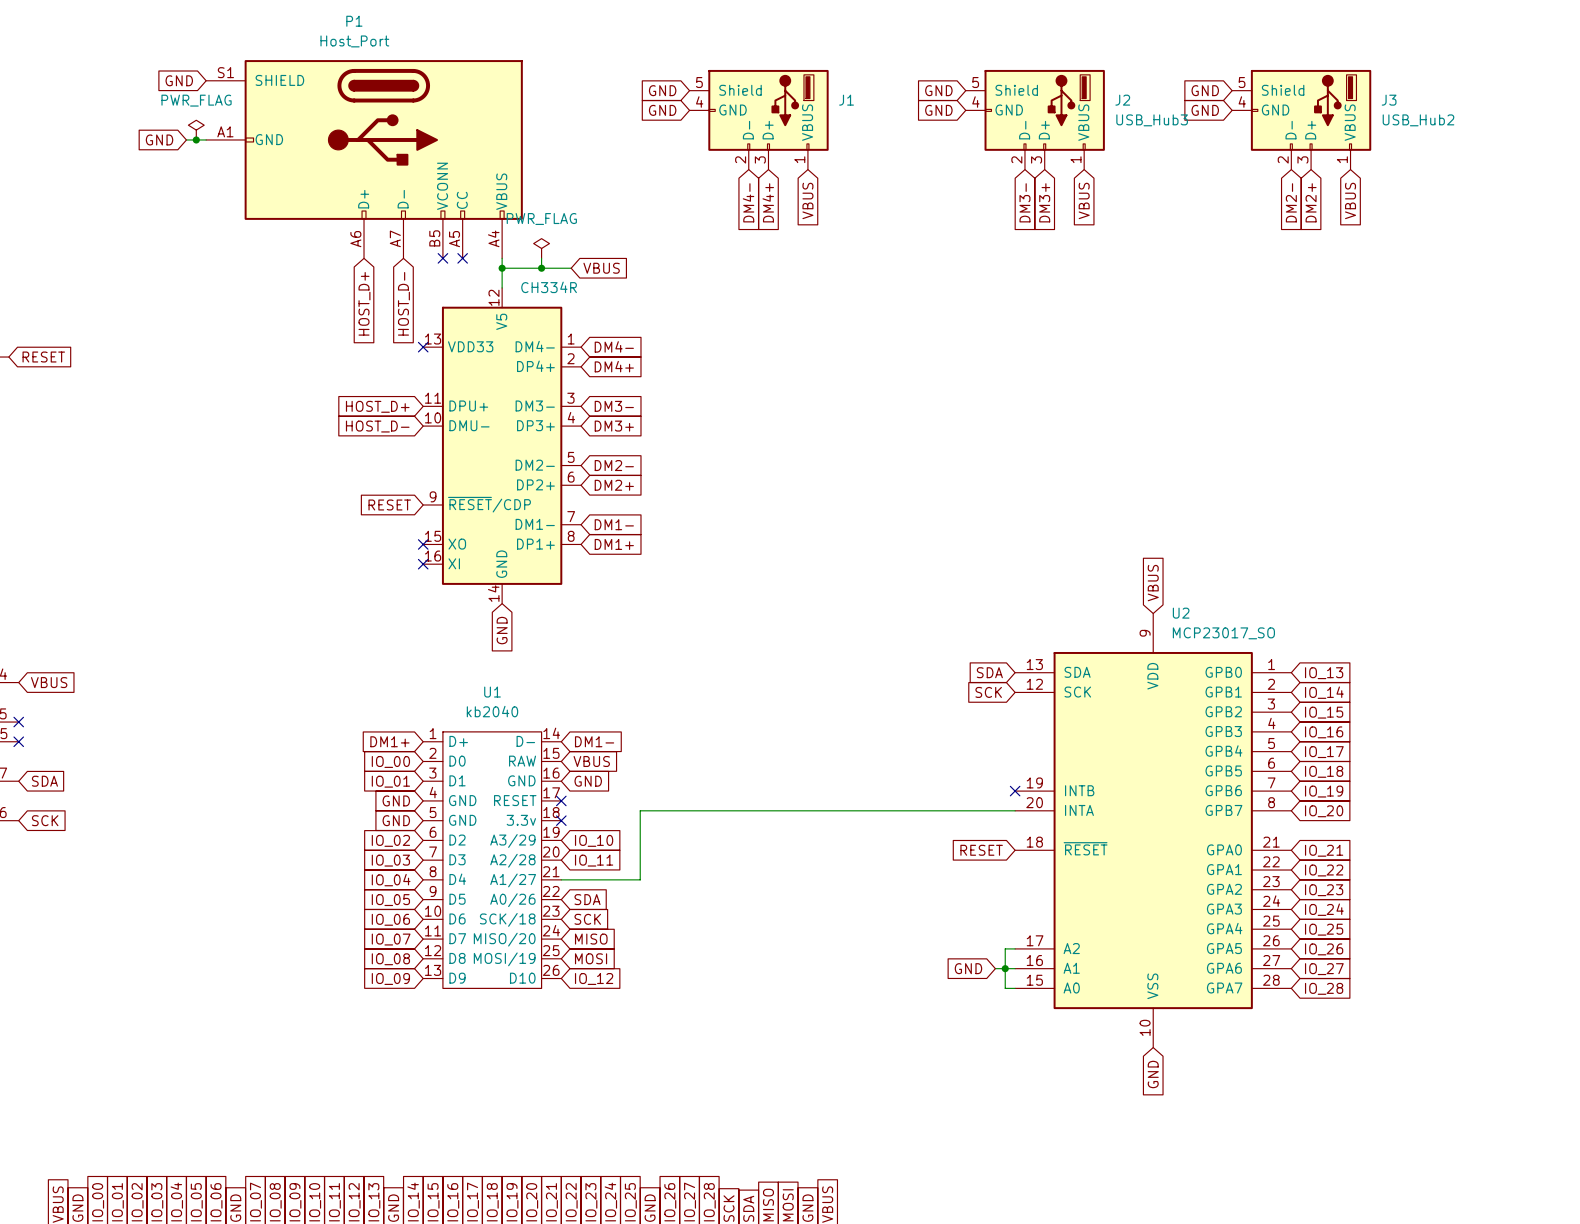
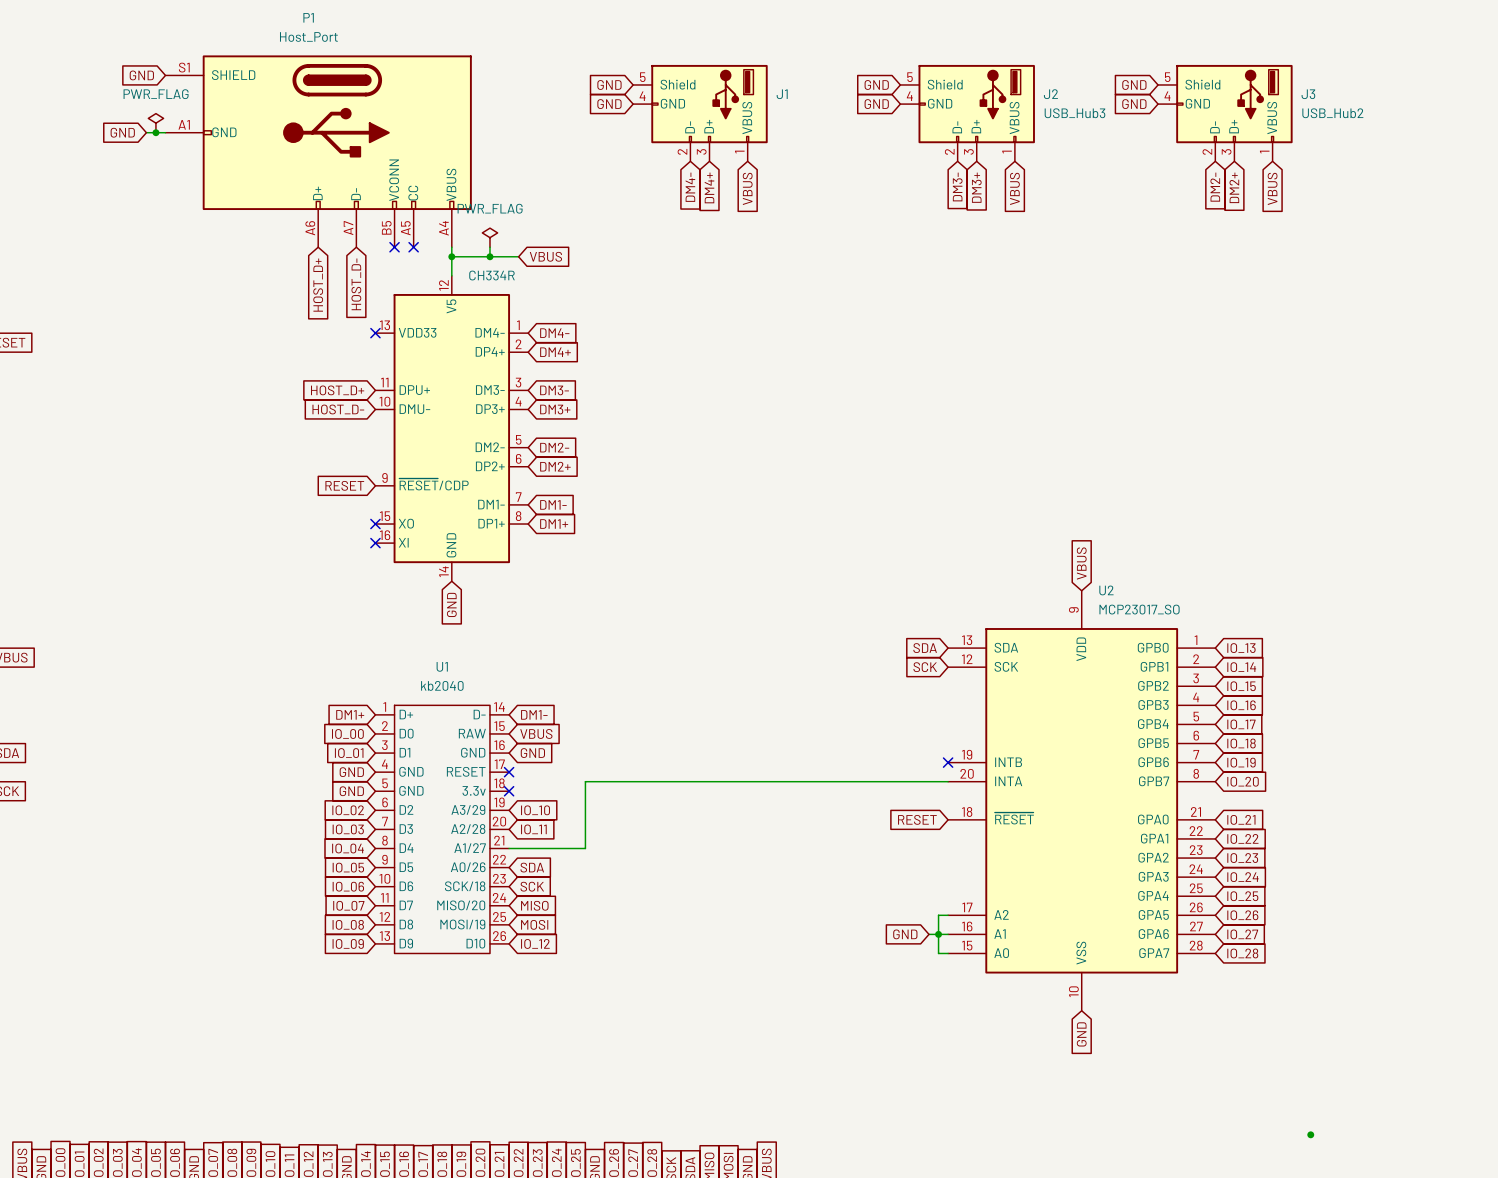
junction: none -> (1310, 1134)

